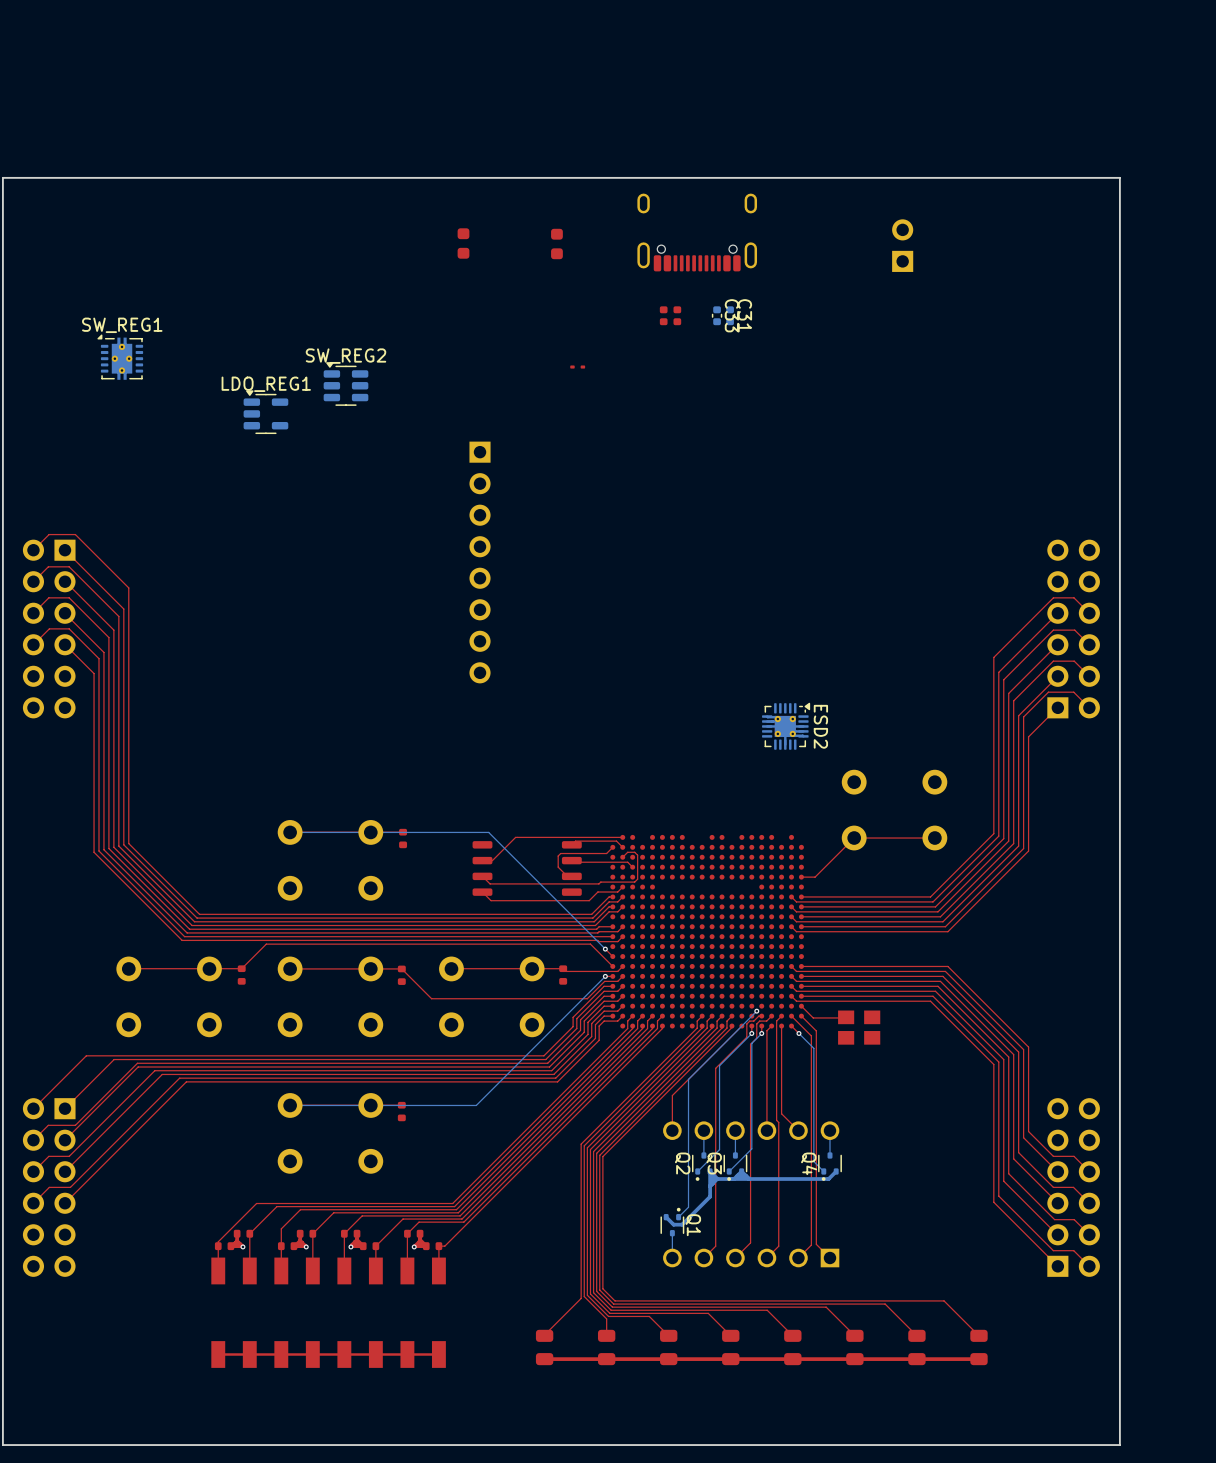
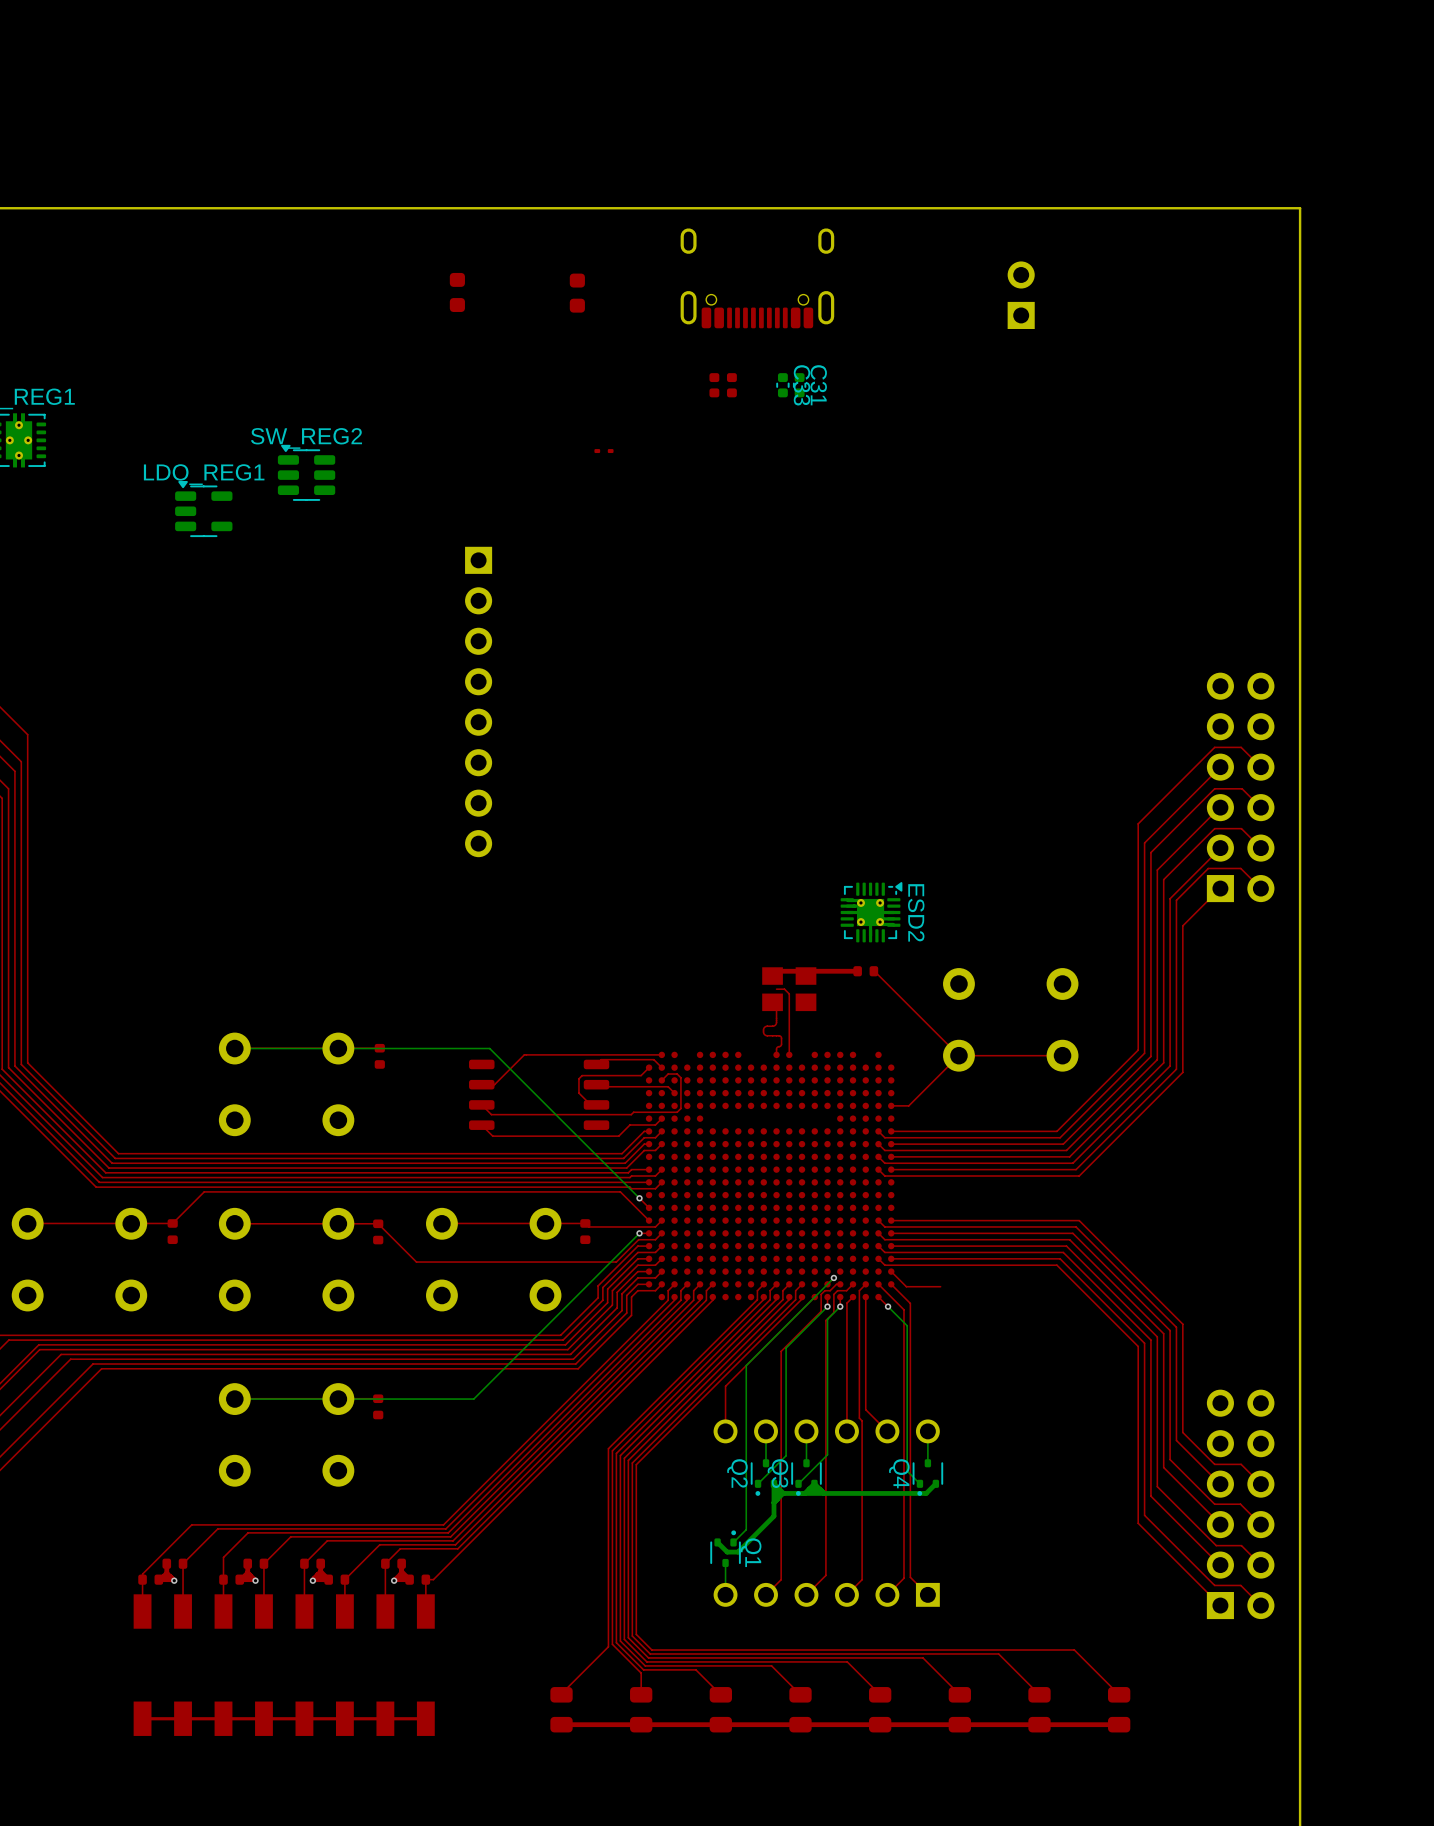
top track: none -> (857, 971) (776, 971)
part: none -> (865, 971)
top track: none -> (873, 971) (958, 1055)
top track: none -> (776, 989) (784, 989) (789, 993) (789, 1054)
top track: none -> (776, 1007) (775, 1024) (765, 1026) (763, 1030) (766, 1035) (781, 1037) (781, 1044) (776, 1048) (776, 1054)
part position: (859, 1027) -> (789, 989)

